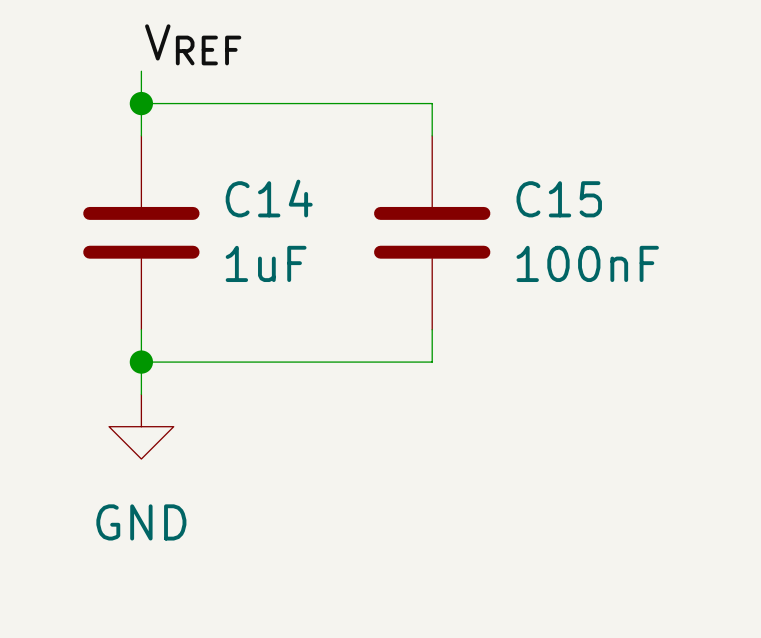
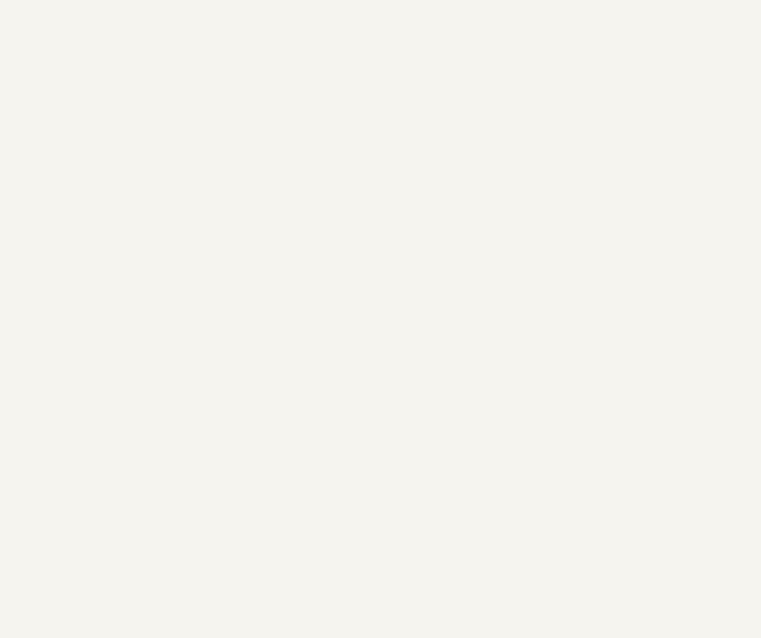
label: VREF (193, 44) -> none
wire: (141, 71) (141, 135) -> none
wire: (141, 103) (432, 103) (432, 135) -> none
junction: (141, 103) -> none
C14: 1uF (141, 232) -> none
C15: 100nF (432, 232) -> none
wire: (141, 329) (141, 394) -> none
wire: (432, 329) (432, 362) (141, 362) -> none
junction: (141, 362) -> none
power symbol: GND (141, 426) -> none

